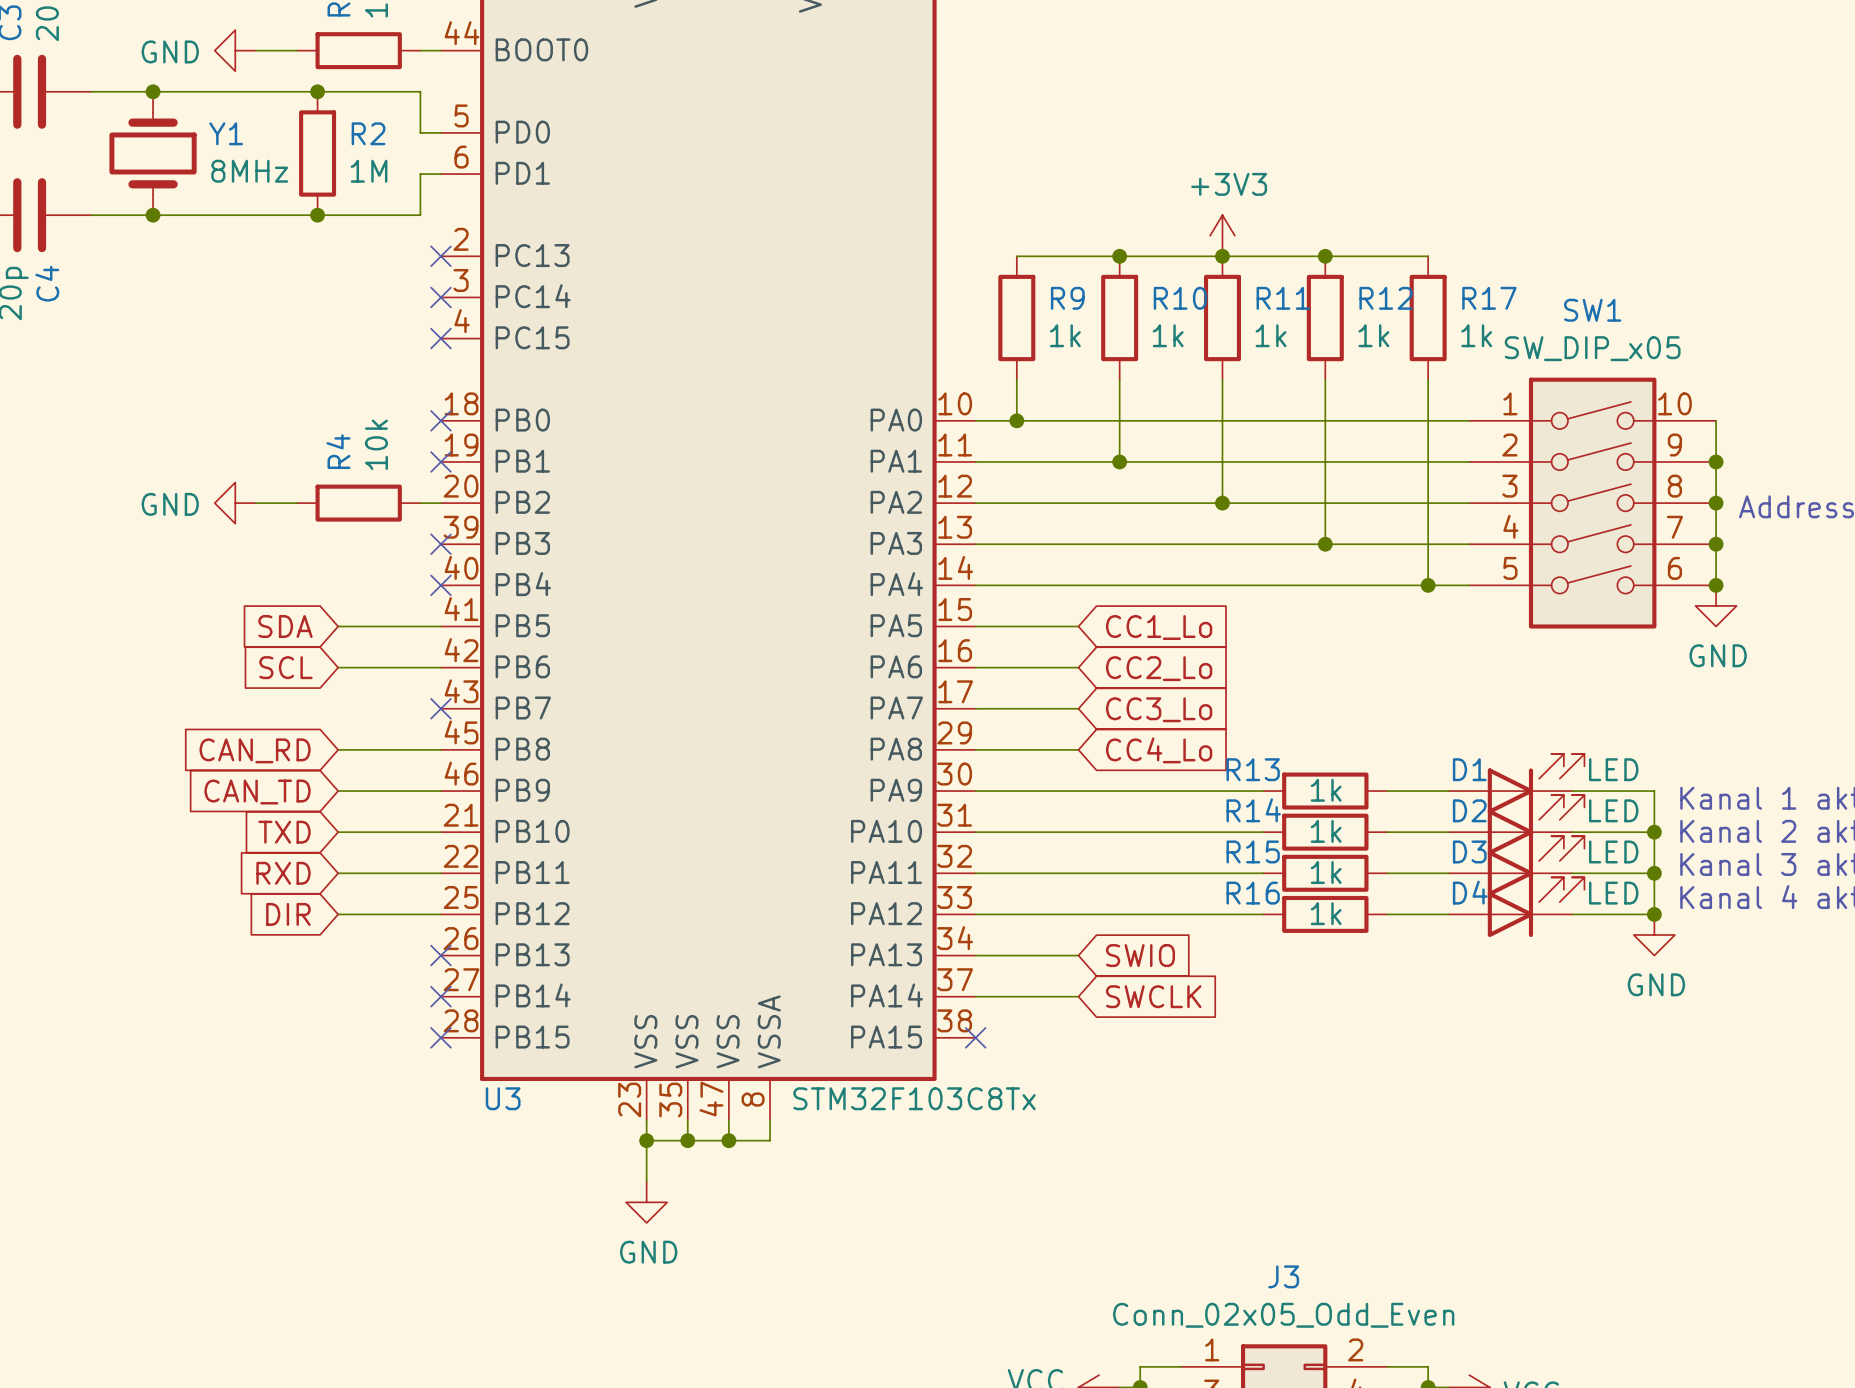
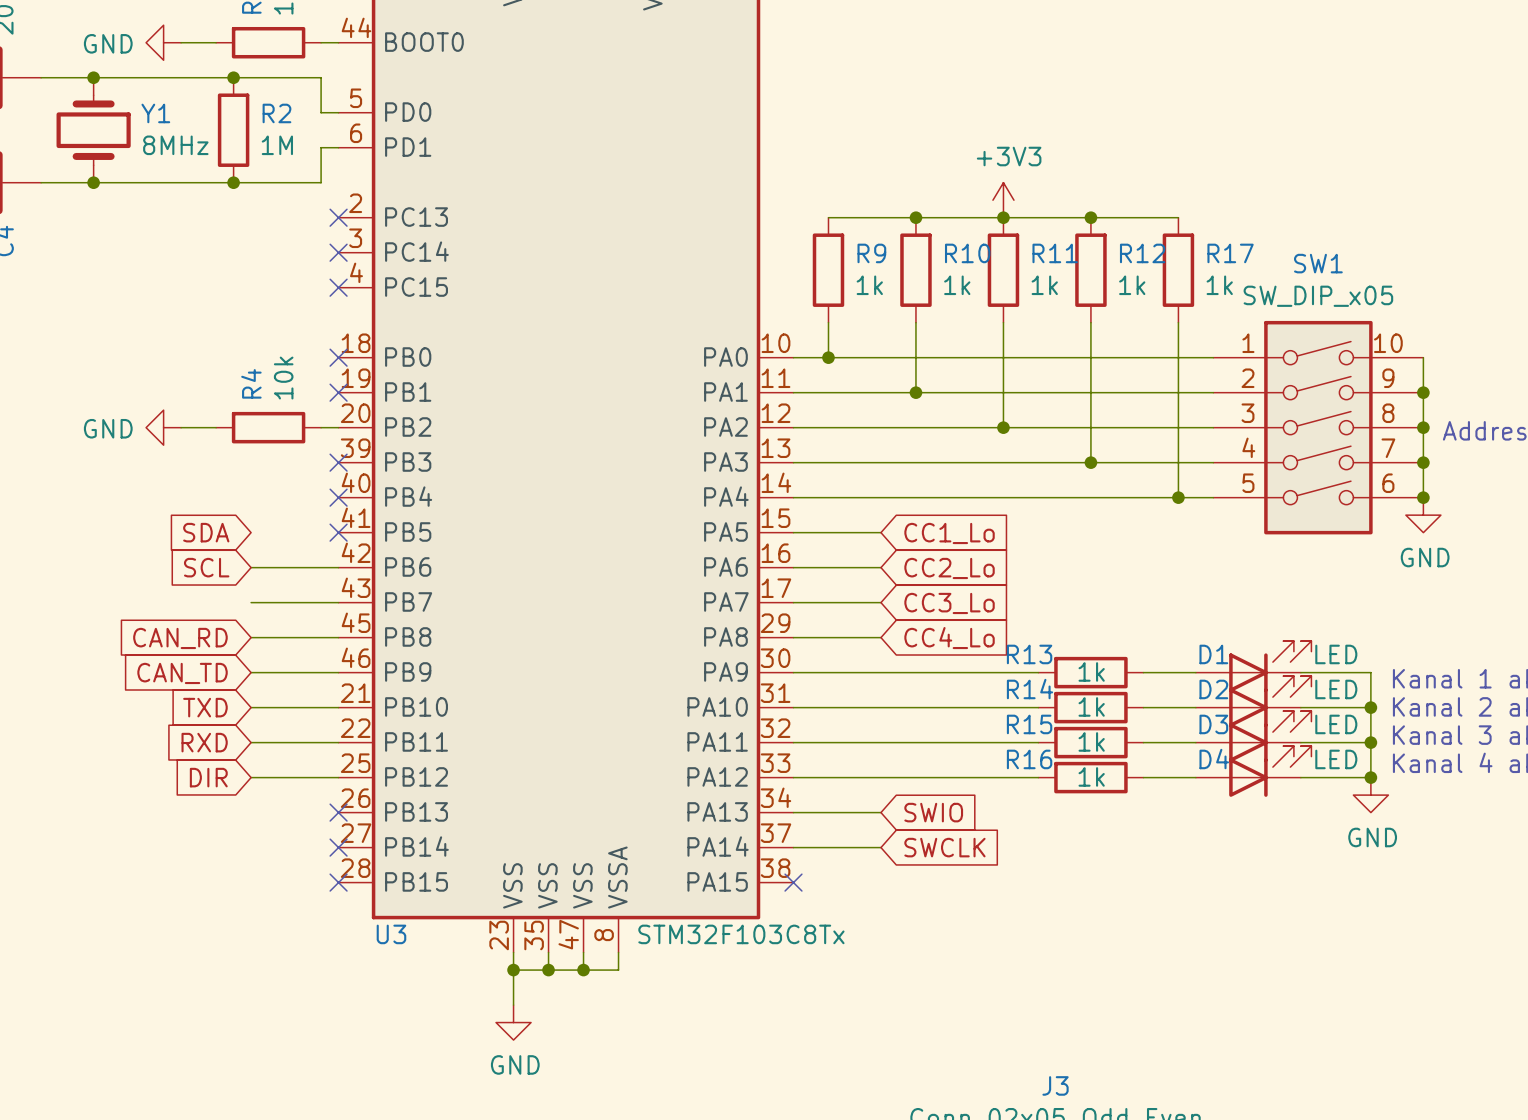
wire: (338, 626) (440, 626) -> (251, 602) (338, 602)
no-connect mark position: (440, 708) -> (338, 532)

